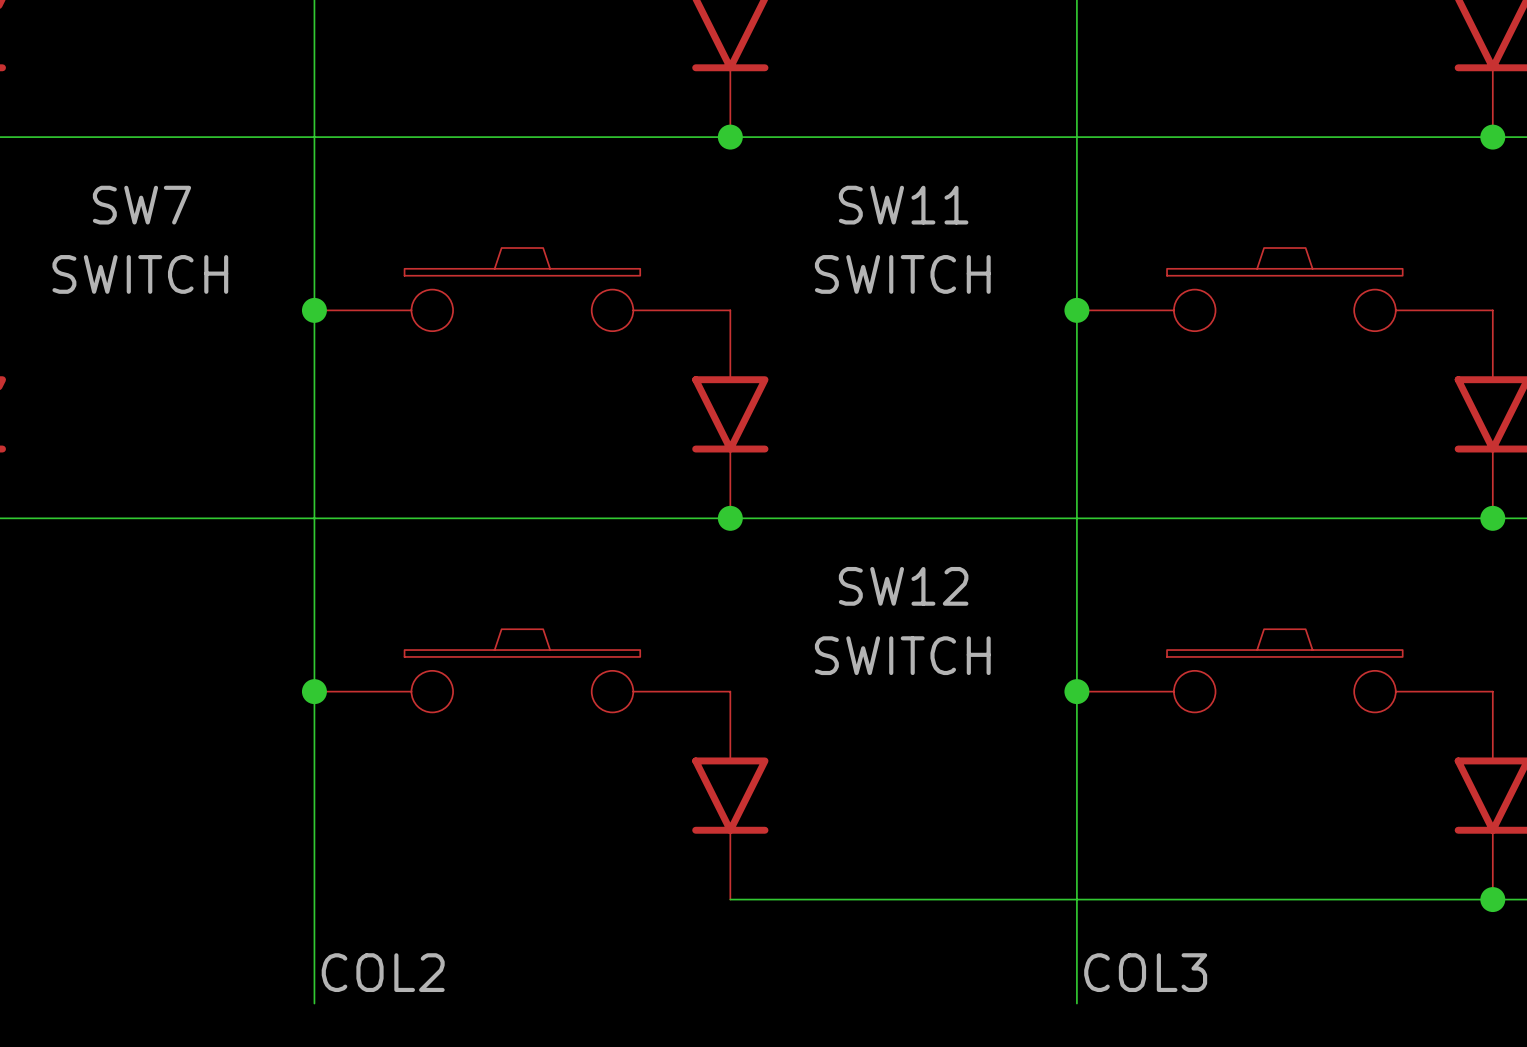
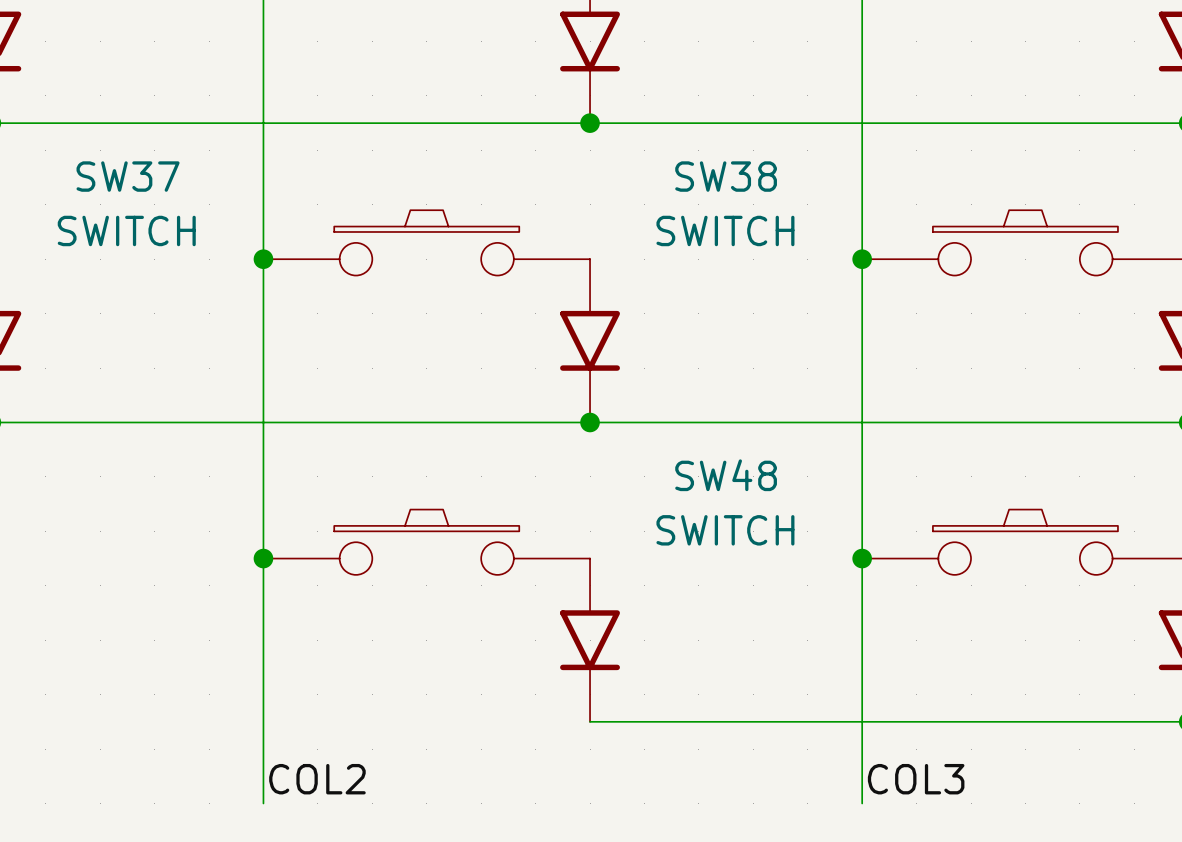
SW7 name: SW7 (141, 205) -> SW37 (128, 176)
SW11 name: SW11 (903, 205) -> SW38 (726, 176)
SW12 name: SW12 (903, 586) -> SW48 (726, 475)

